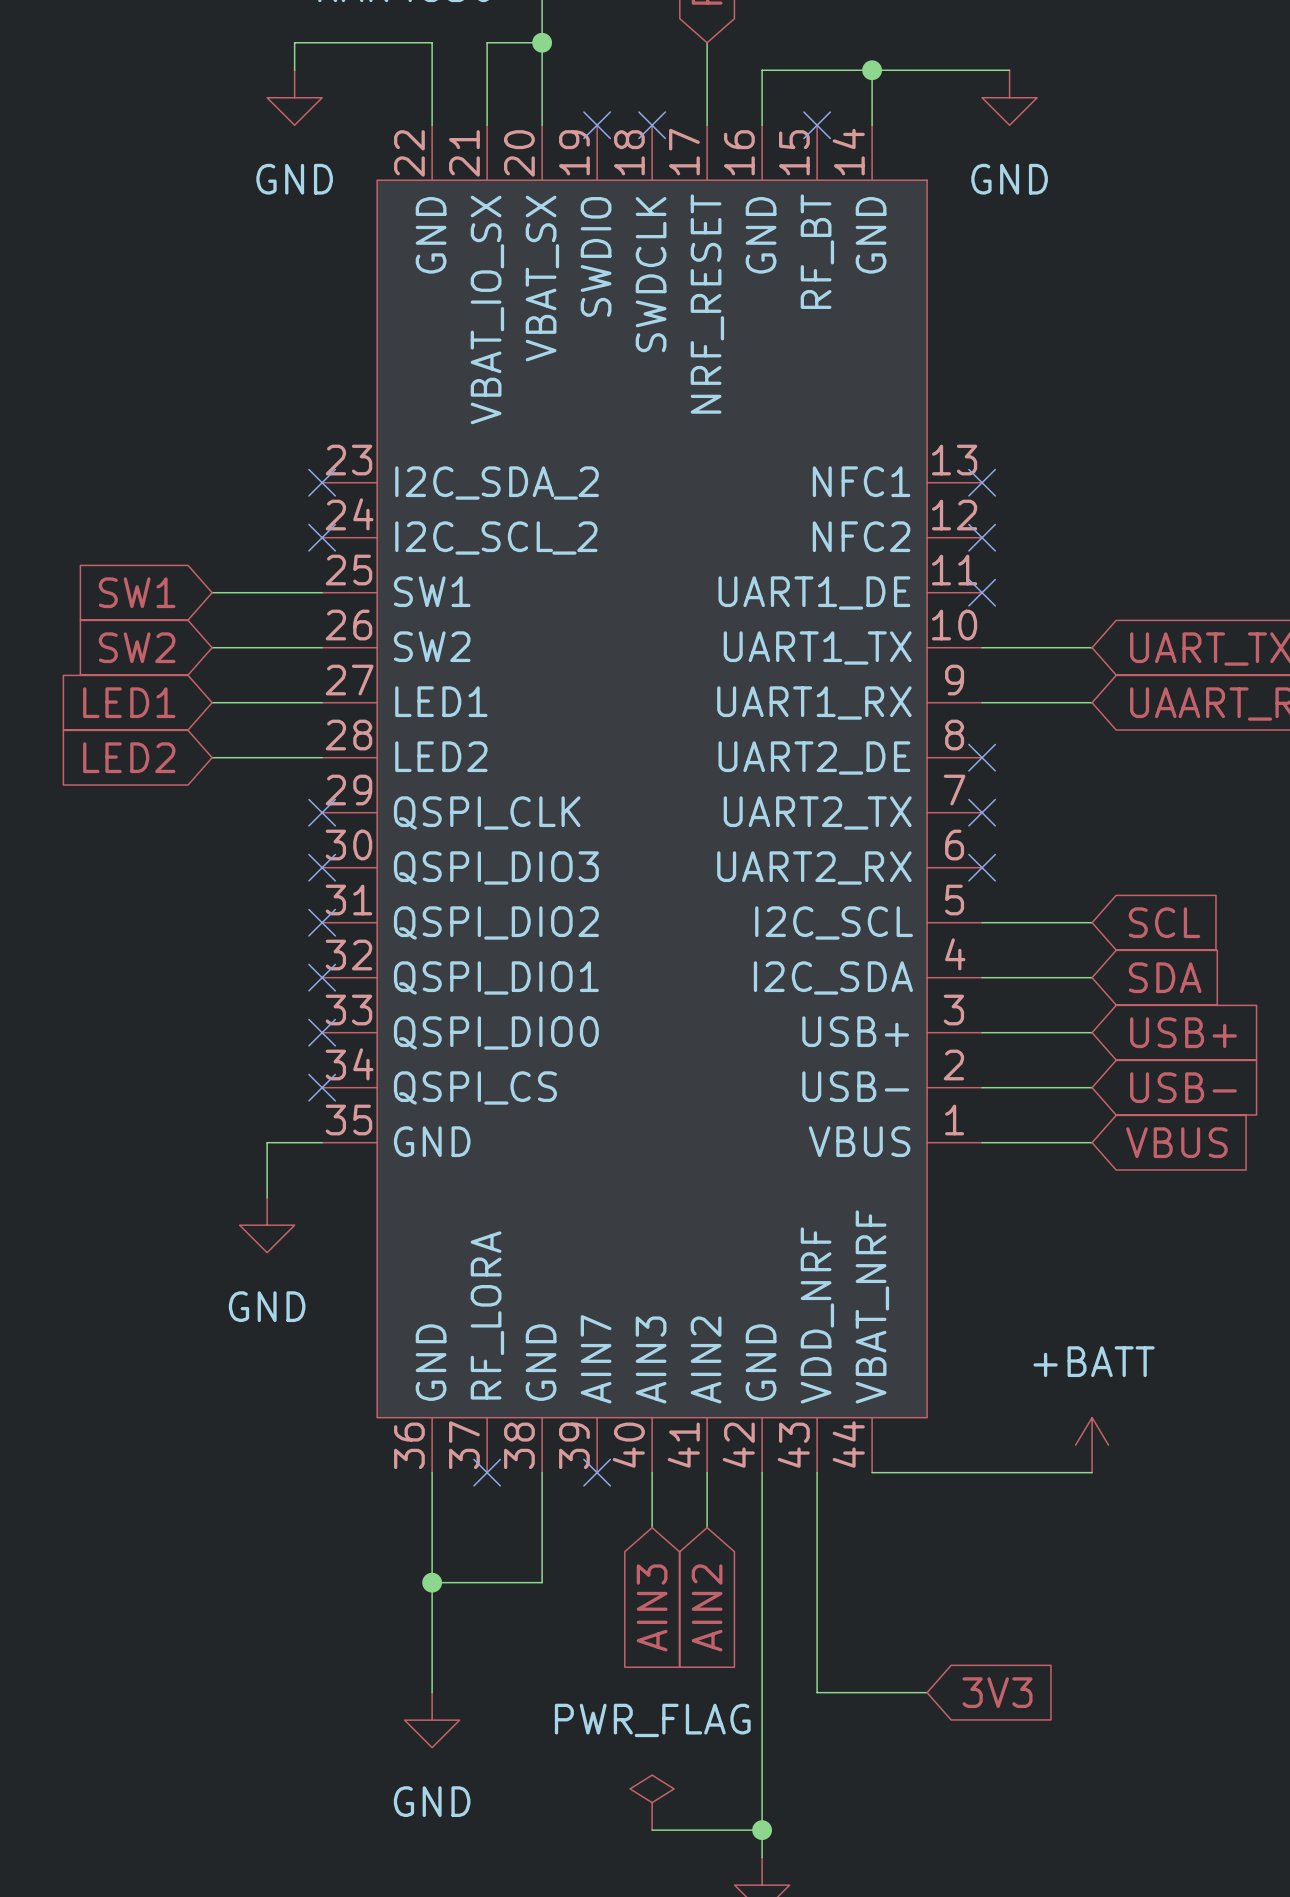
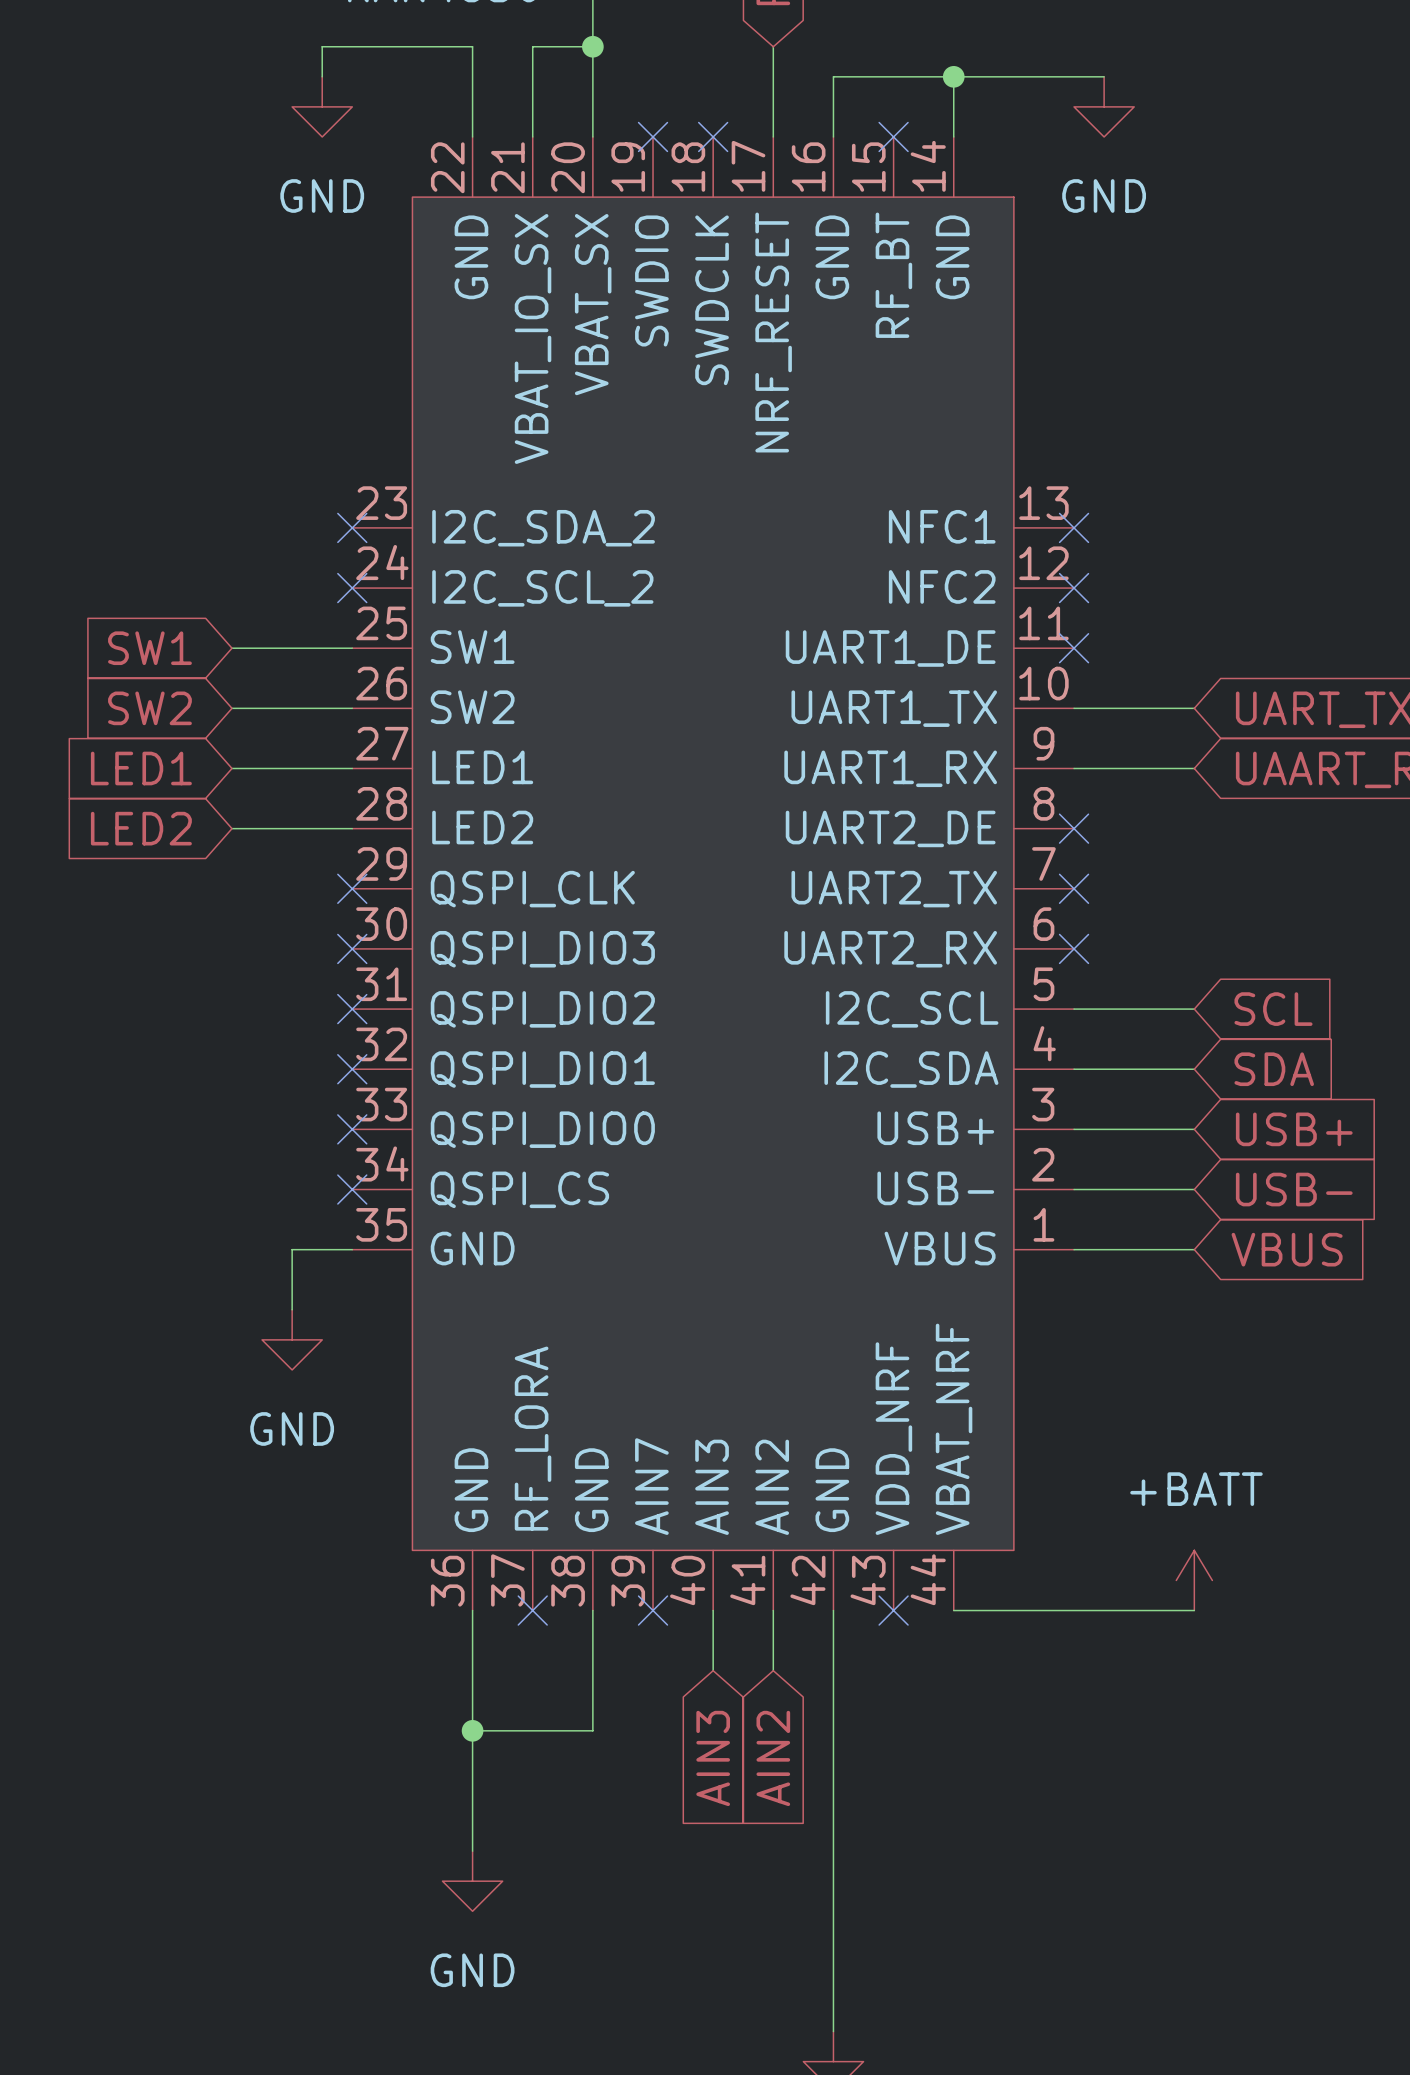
wire: (817, 1472) (817, 1692) (927, 1692) -> none
no-connect mark: none -> (893, 1610)
global label: 3V3 (997, 1692) -> none
power symbol: PWR_FLAG (652, 1802) -> none
wire: (652, 1830) (762, 1830) -> none
junction: (762, 1830) -> none

